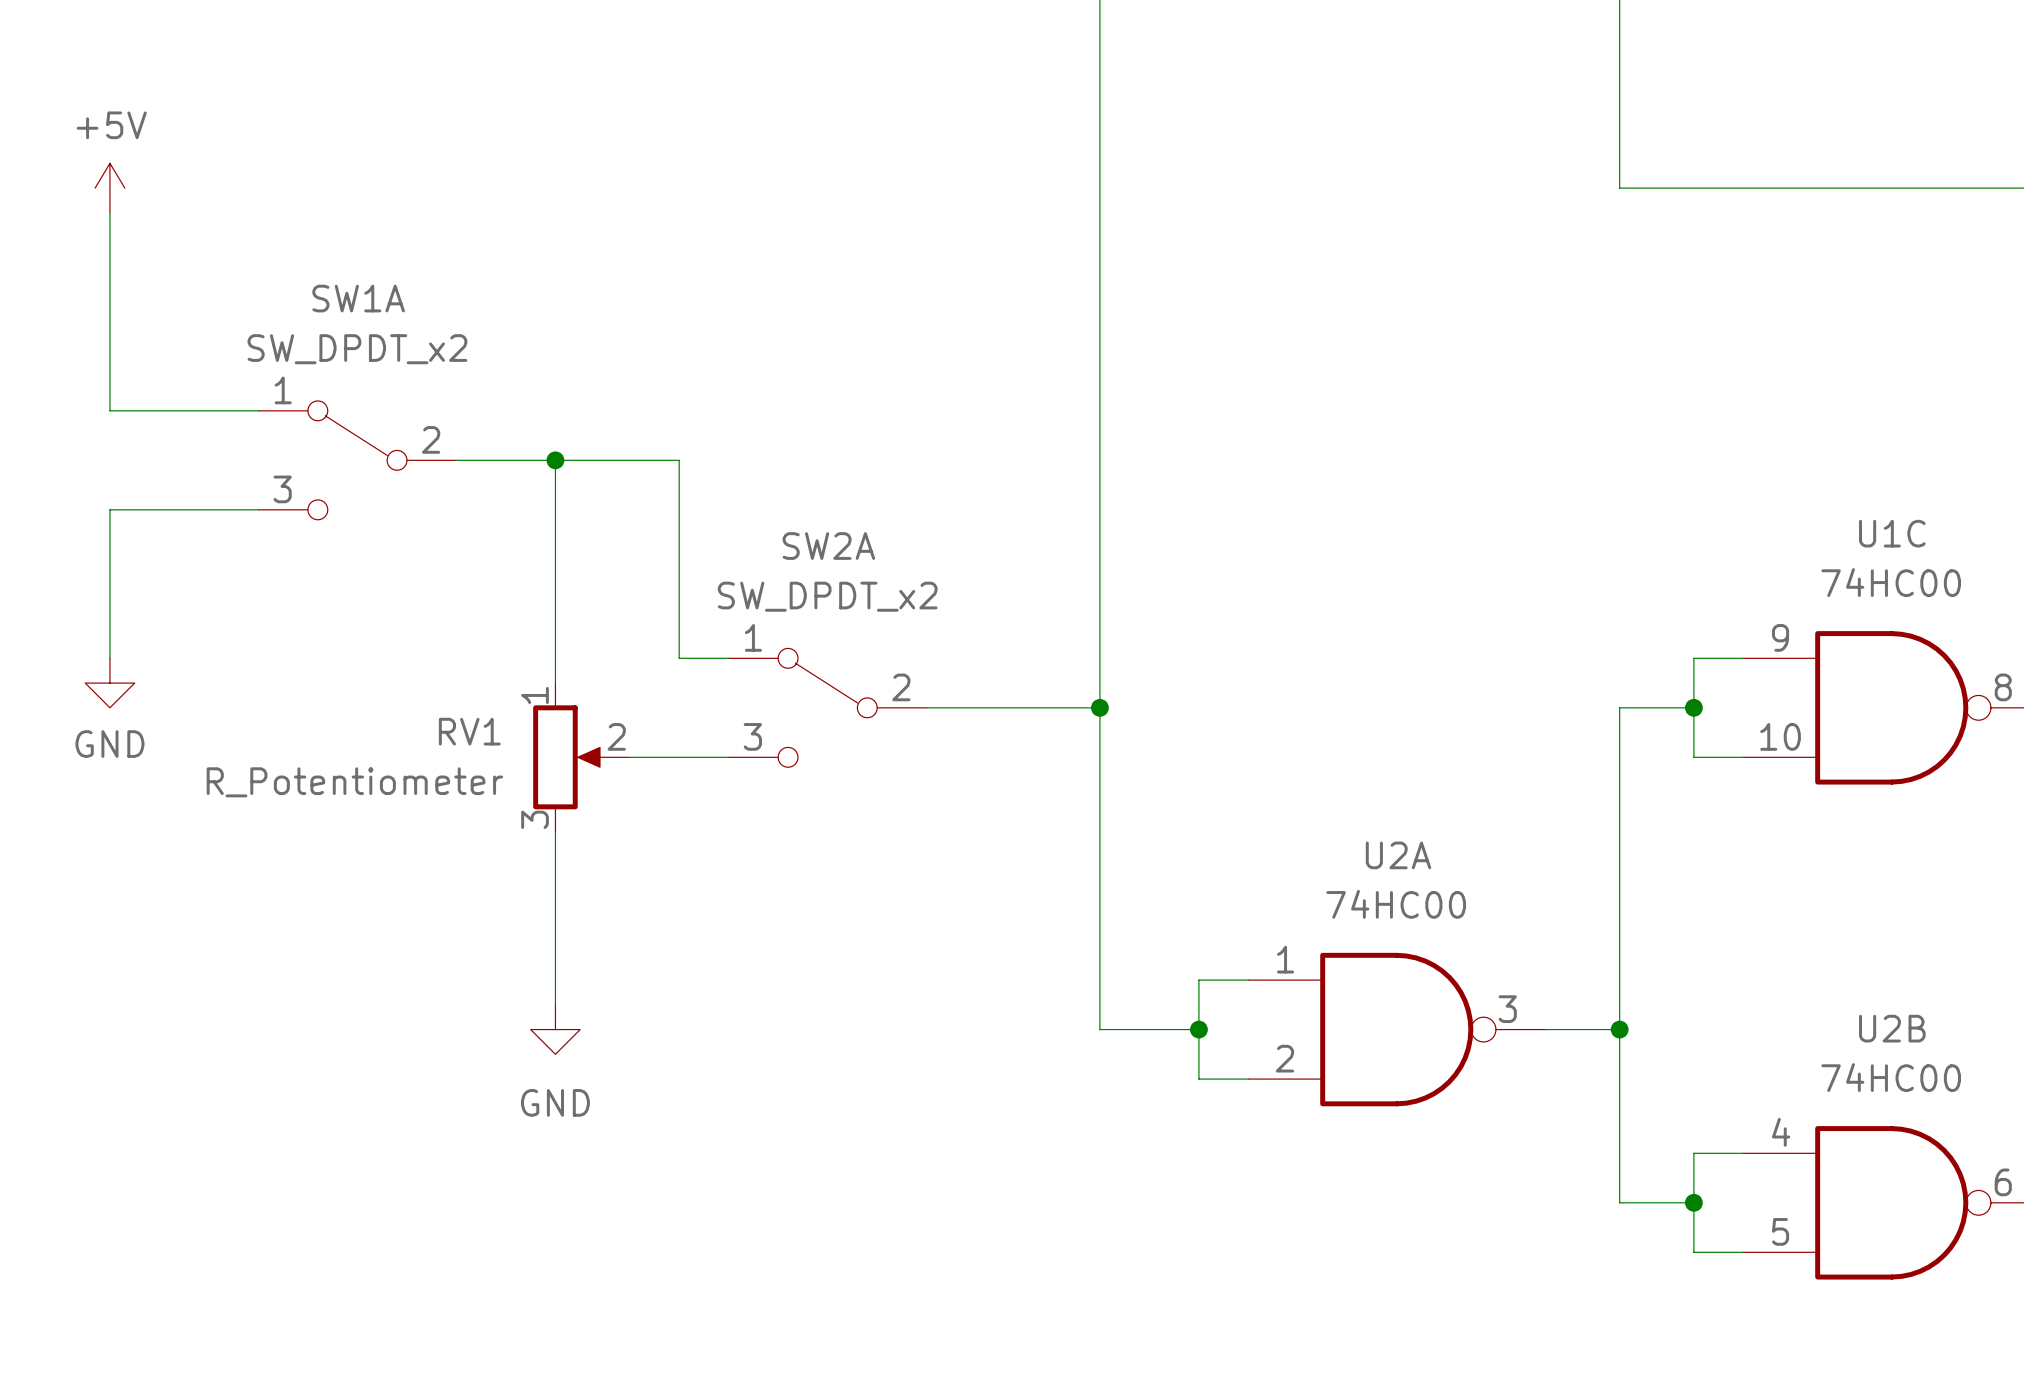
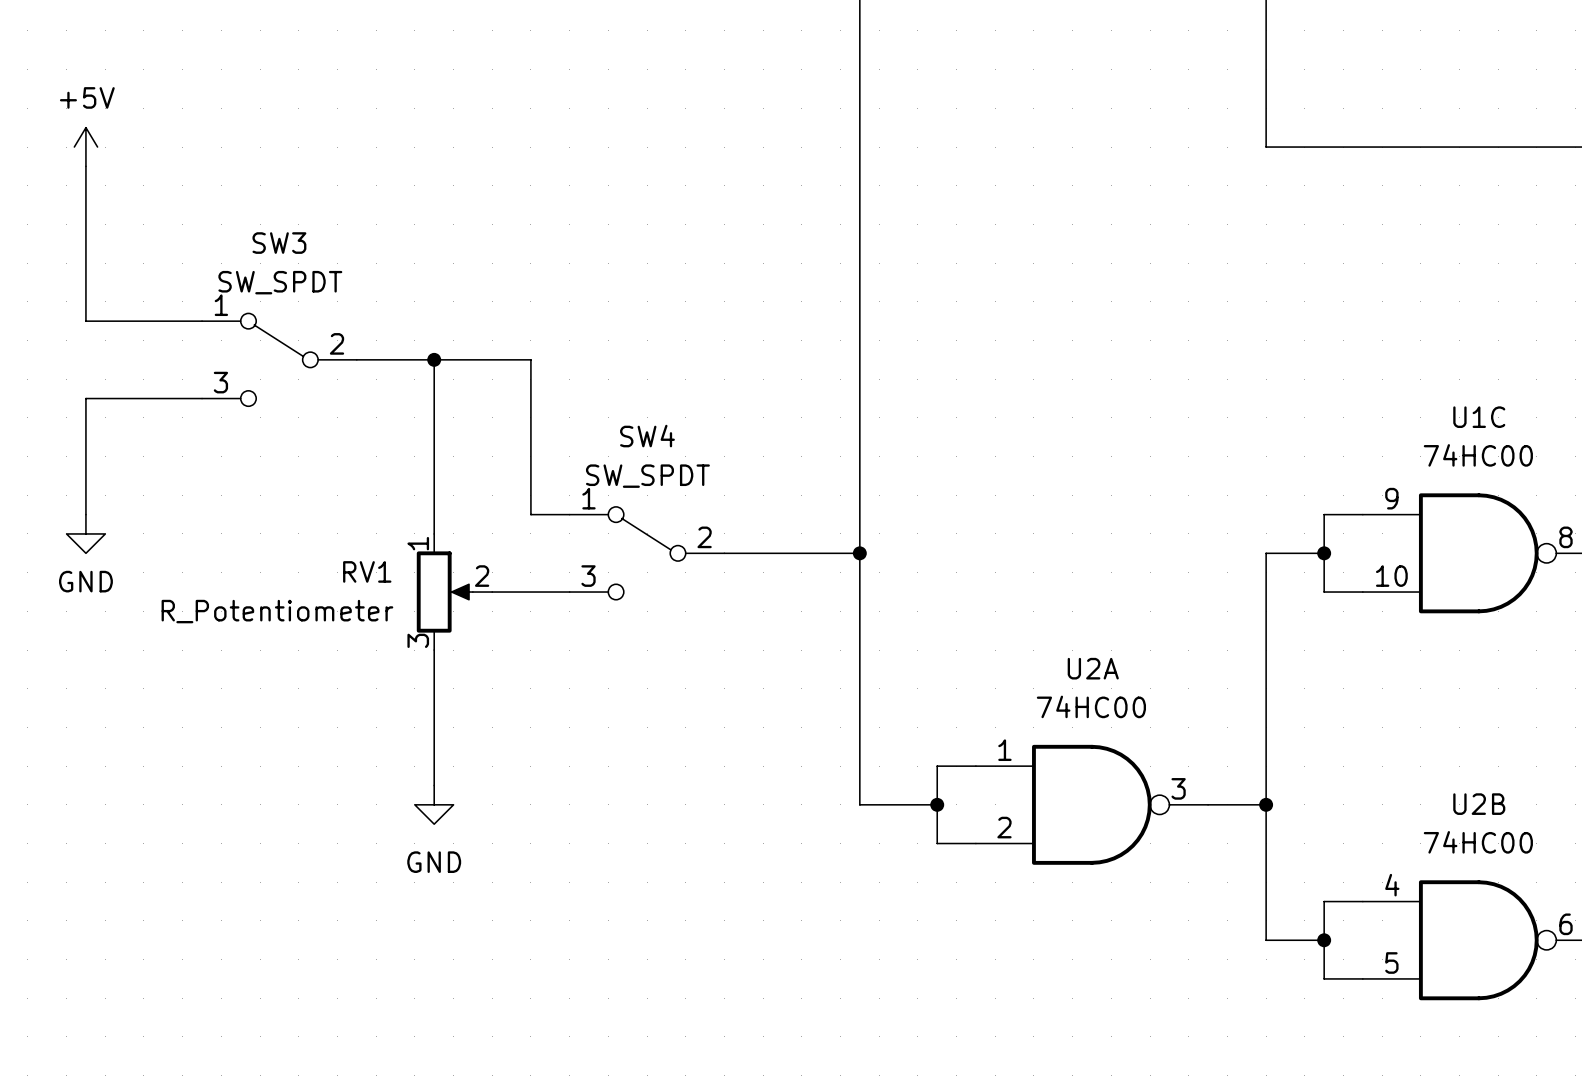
SW1A name: SW1A (358, 298) -> SW3 (279, 243)
SW1A value: SW_DPDT_x2 (357, 349) -> SW_SPDT (280, 282)
SW2A name: SW2A (828, 546) -> SW4 (647, 436)
SW2A value: SW_DPDT_x2 (827, 596) -> SW_SPDT (647, 476)

